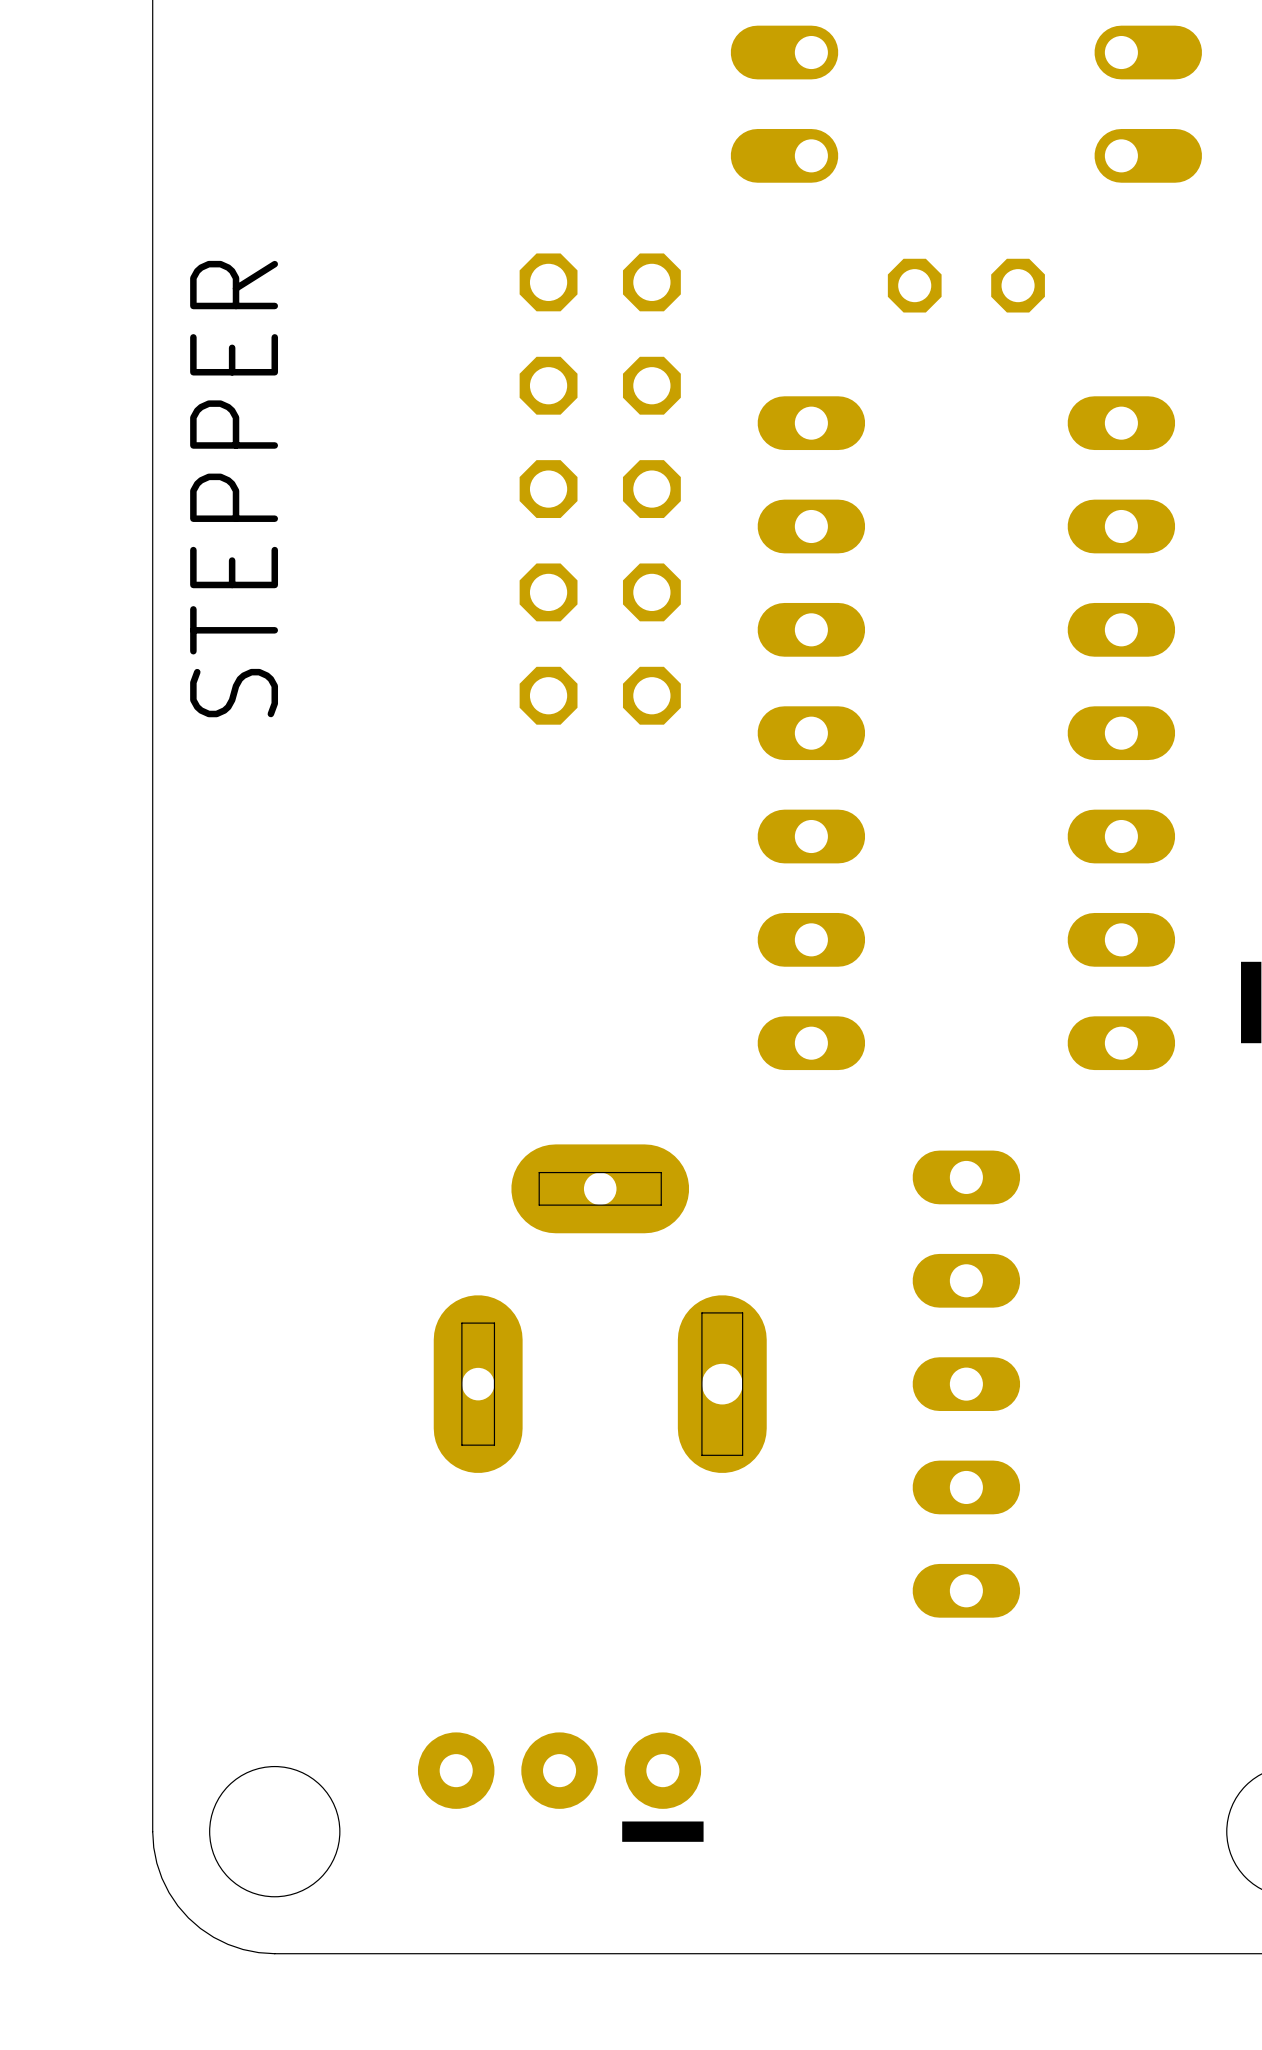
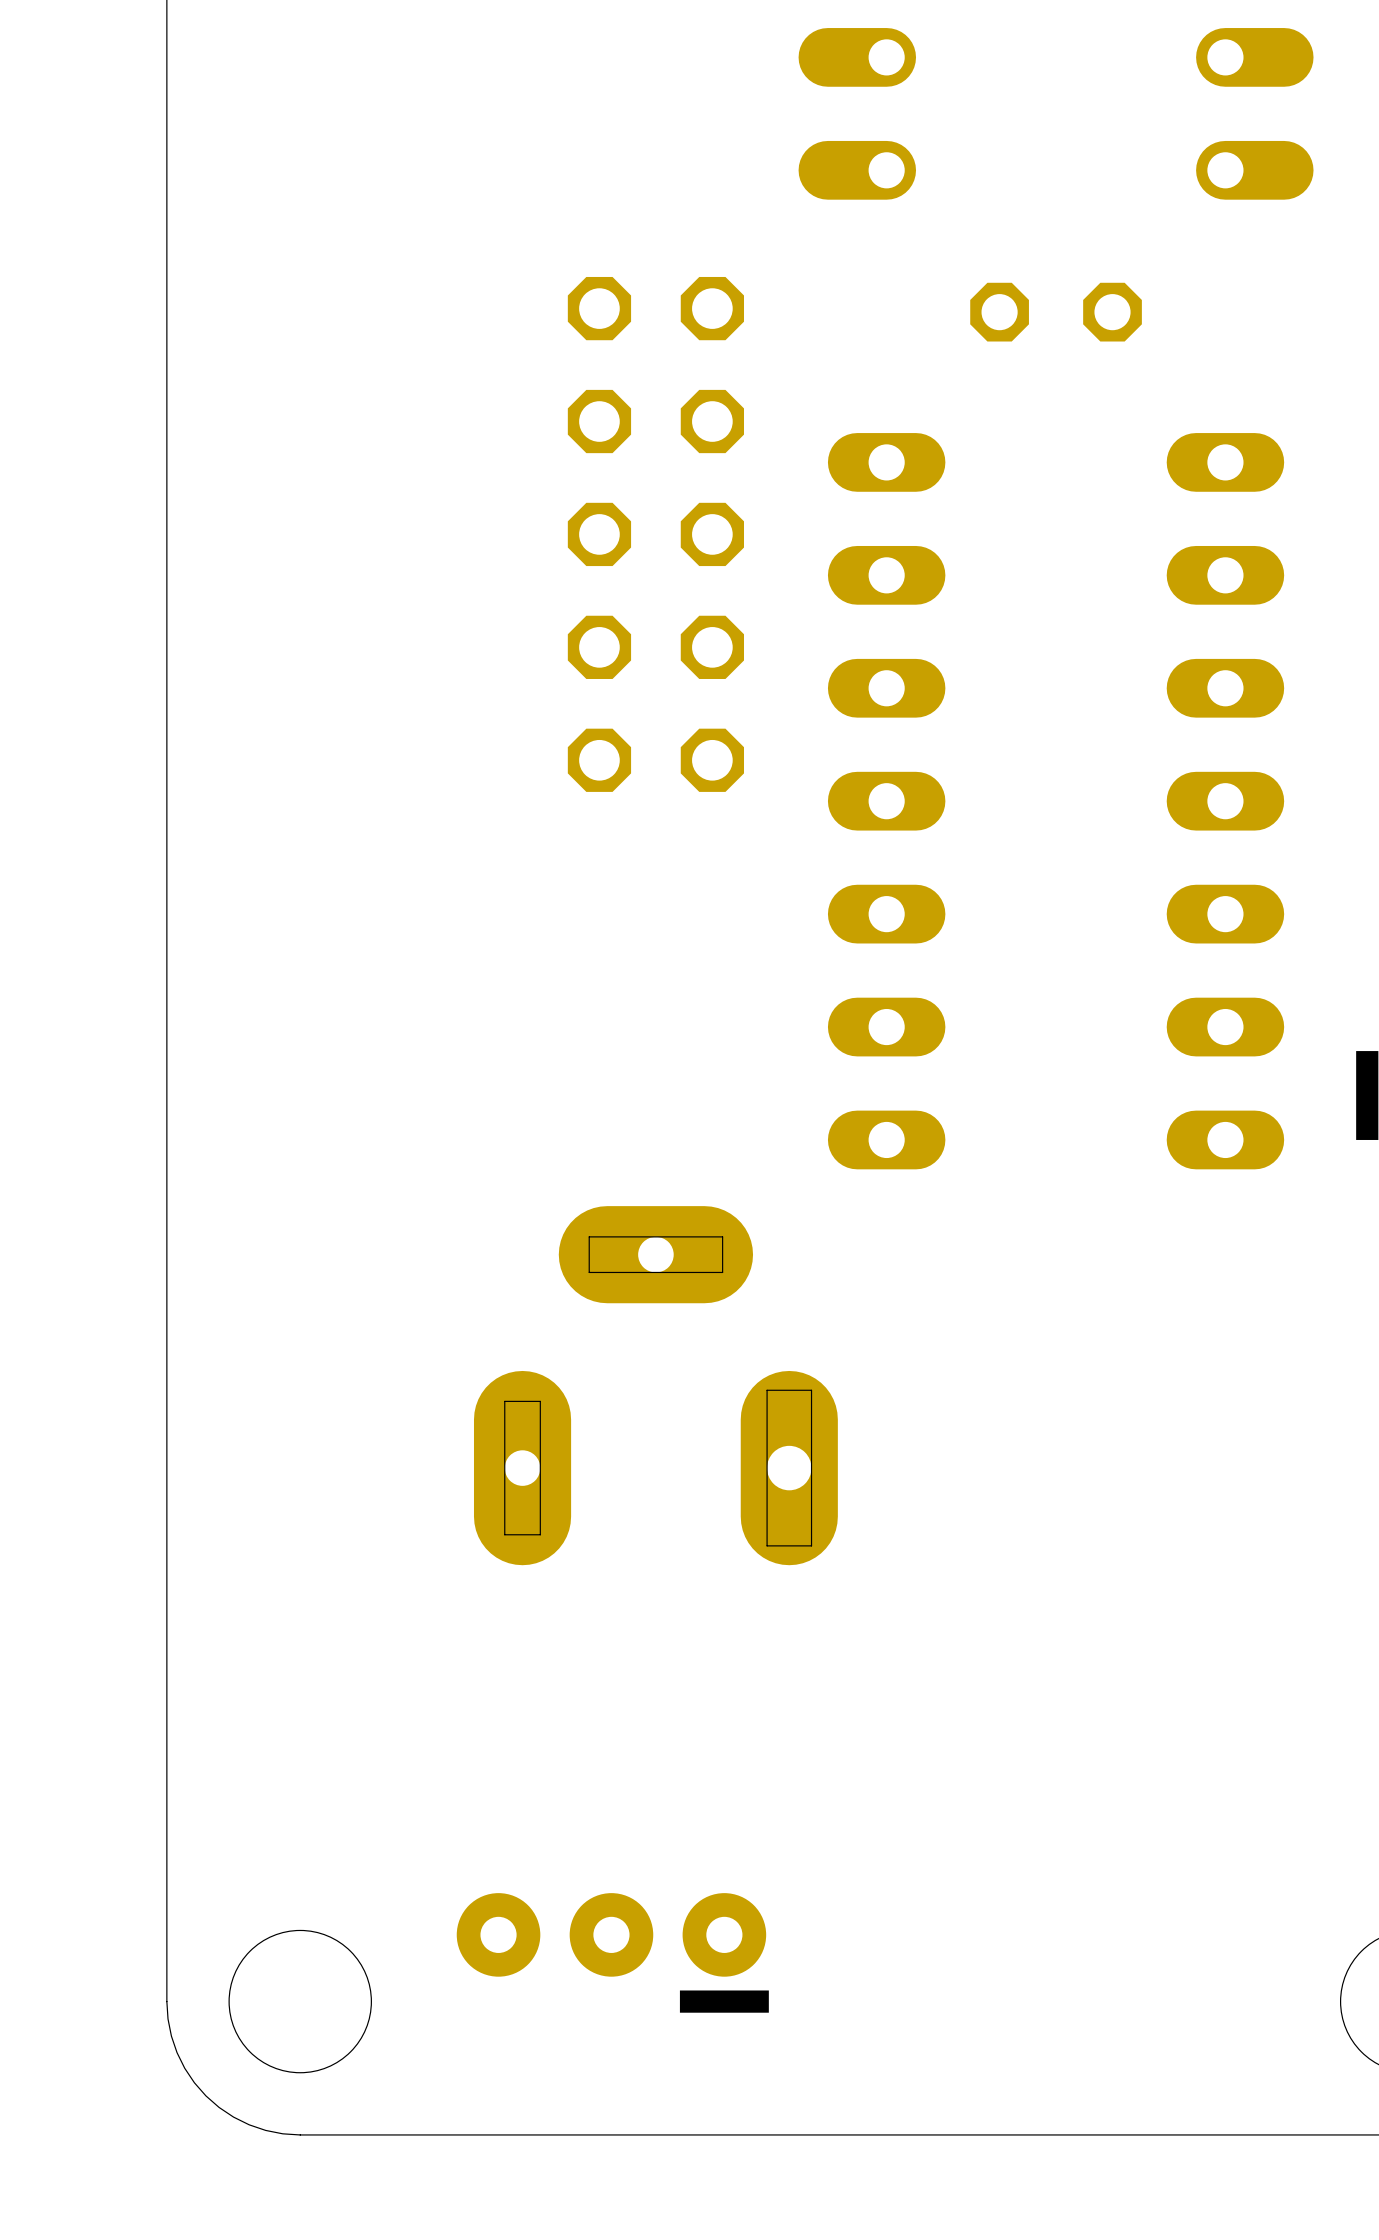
text: STEPPER (234, 489) -> none
part position: (600, 1308) -> (655, 1385)
part: (966, 1384) -> none

